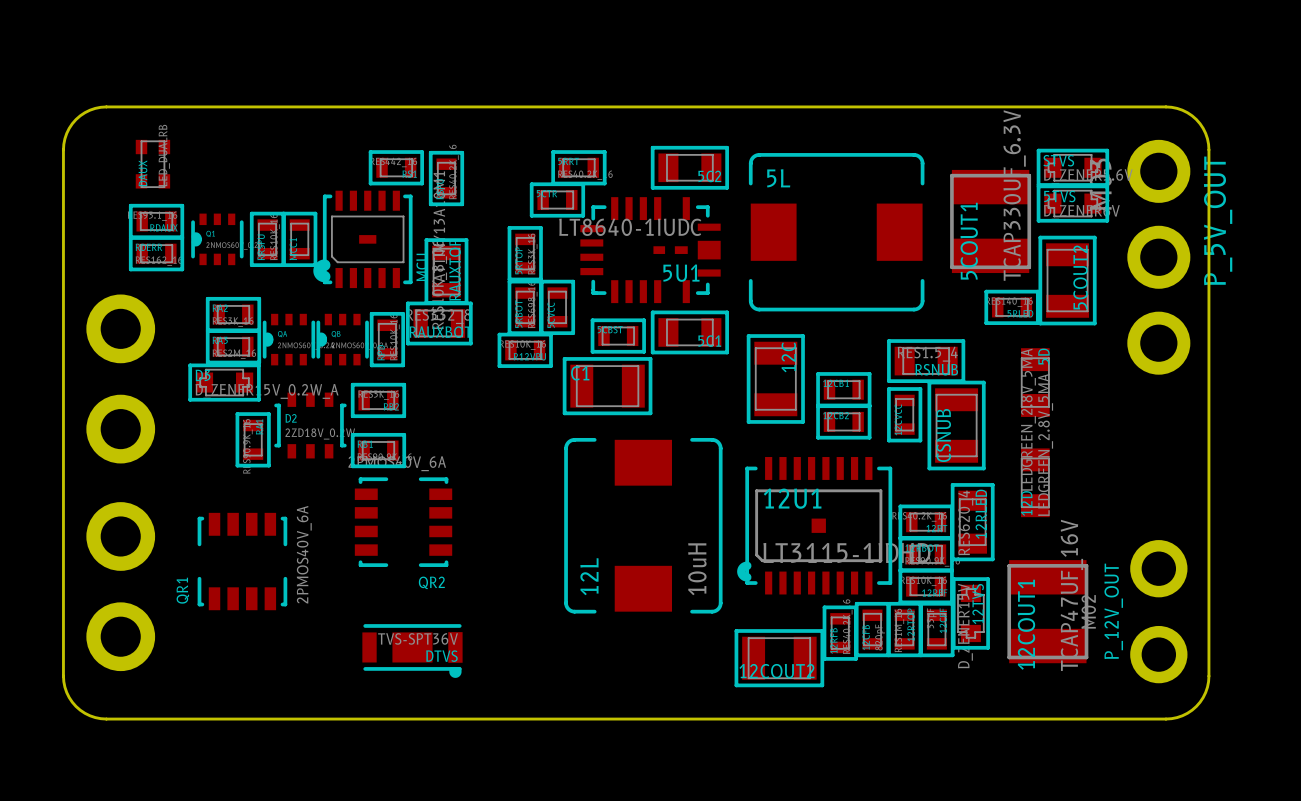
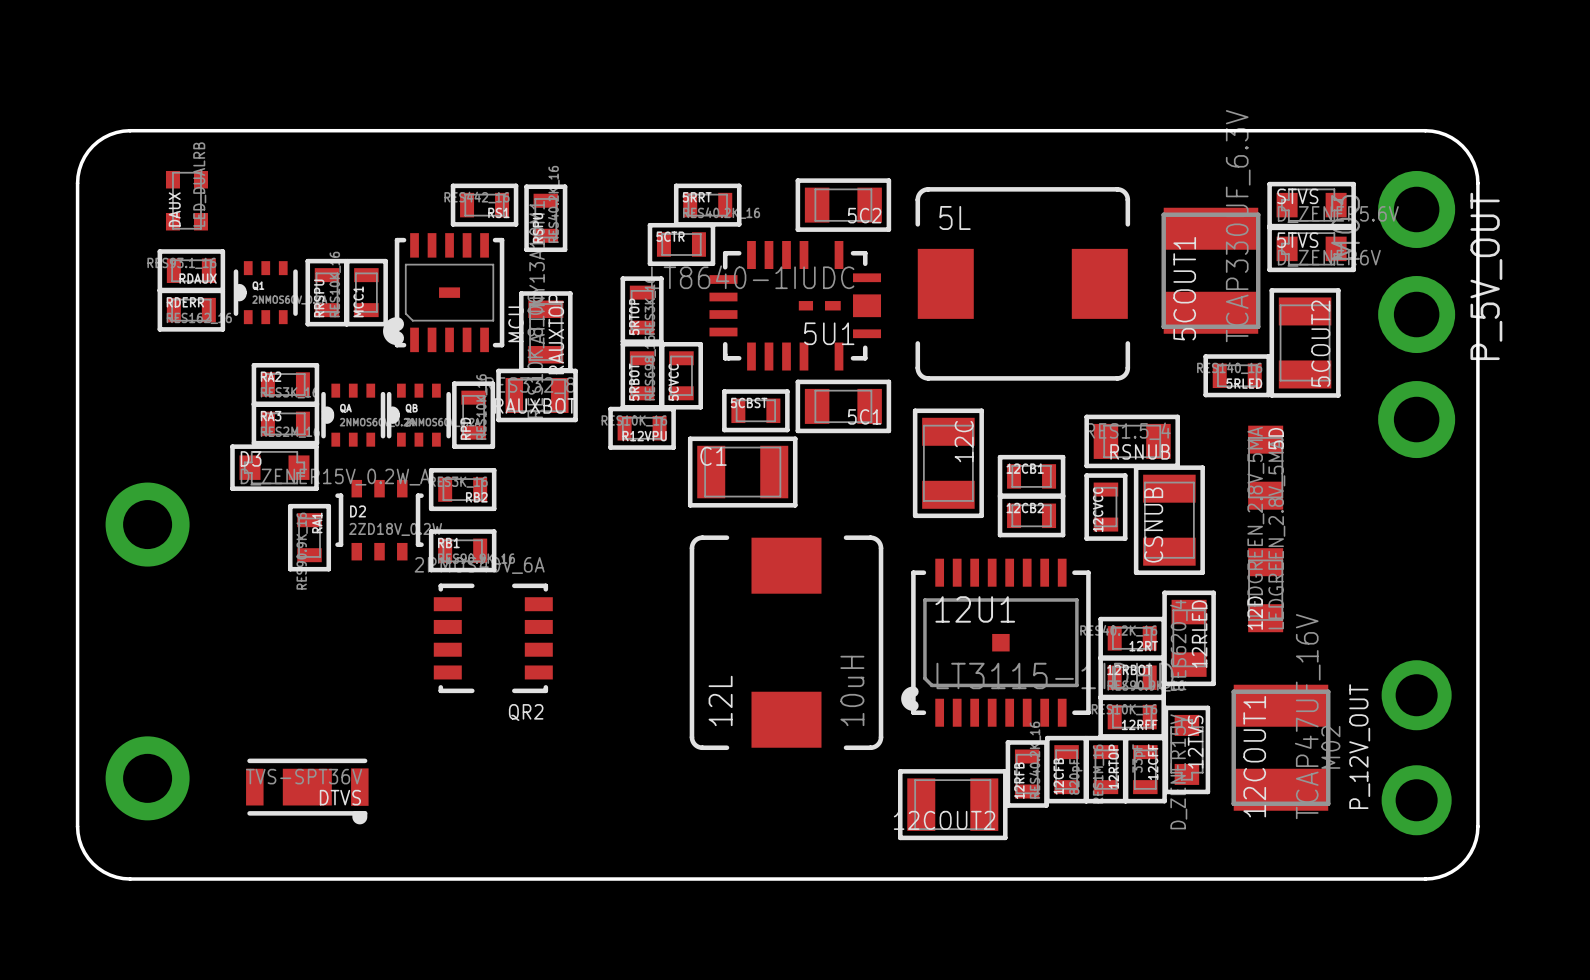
part: (120, 328) -> none
part: (120, 536) -> none
QR1: 2PMOS40V_6A (242, 561) -> none
DTVS position: (412, 651) -> (307, 791)

